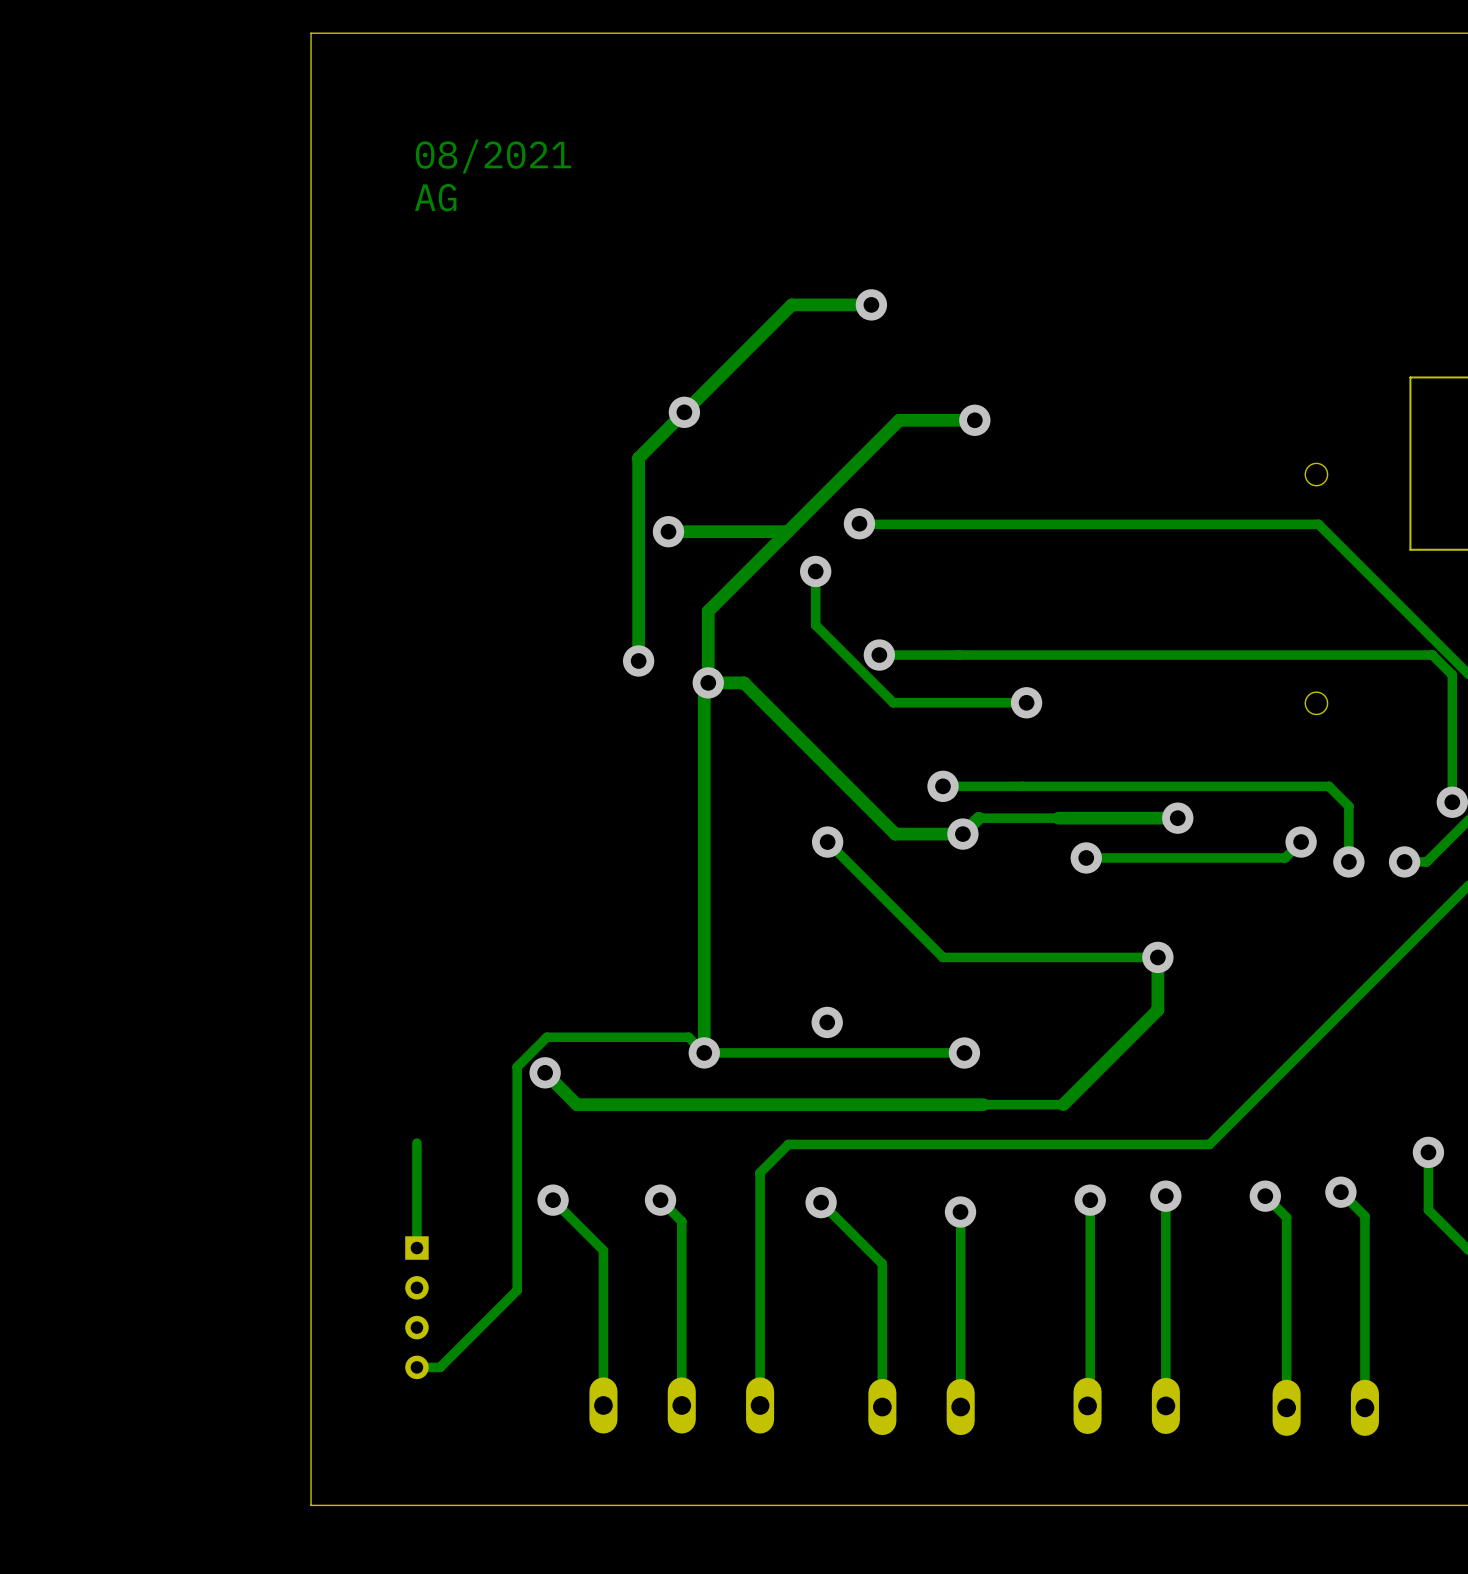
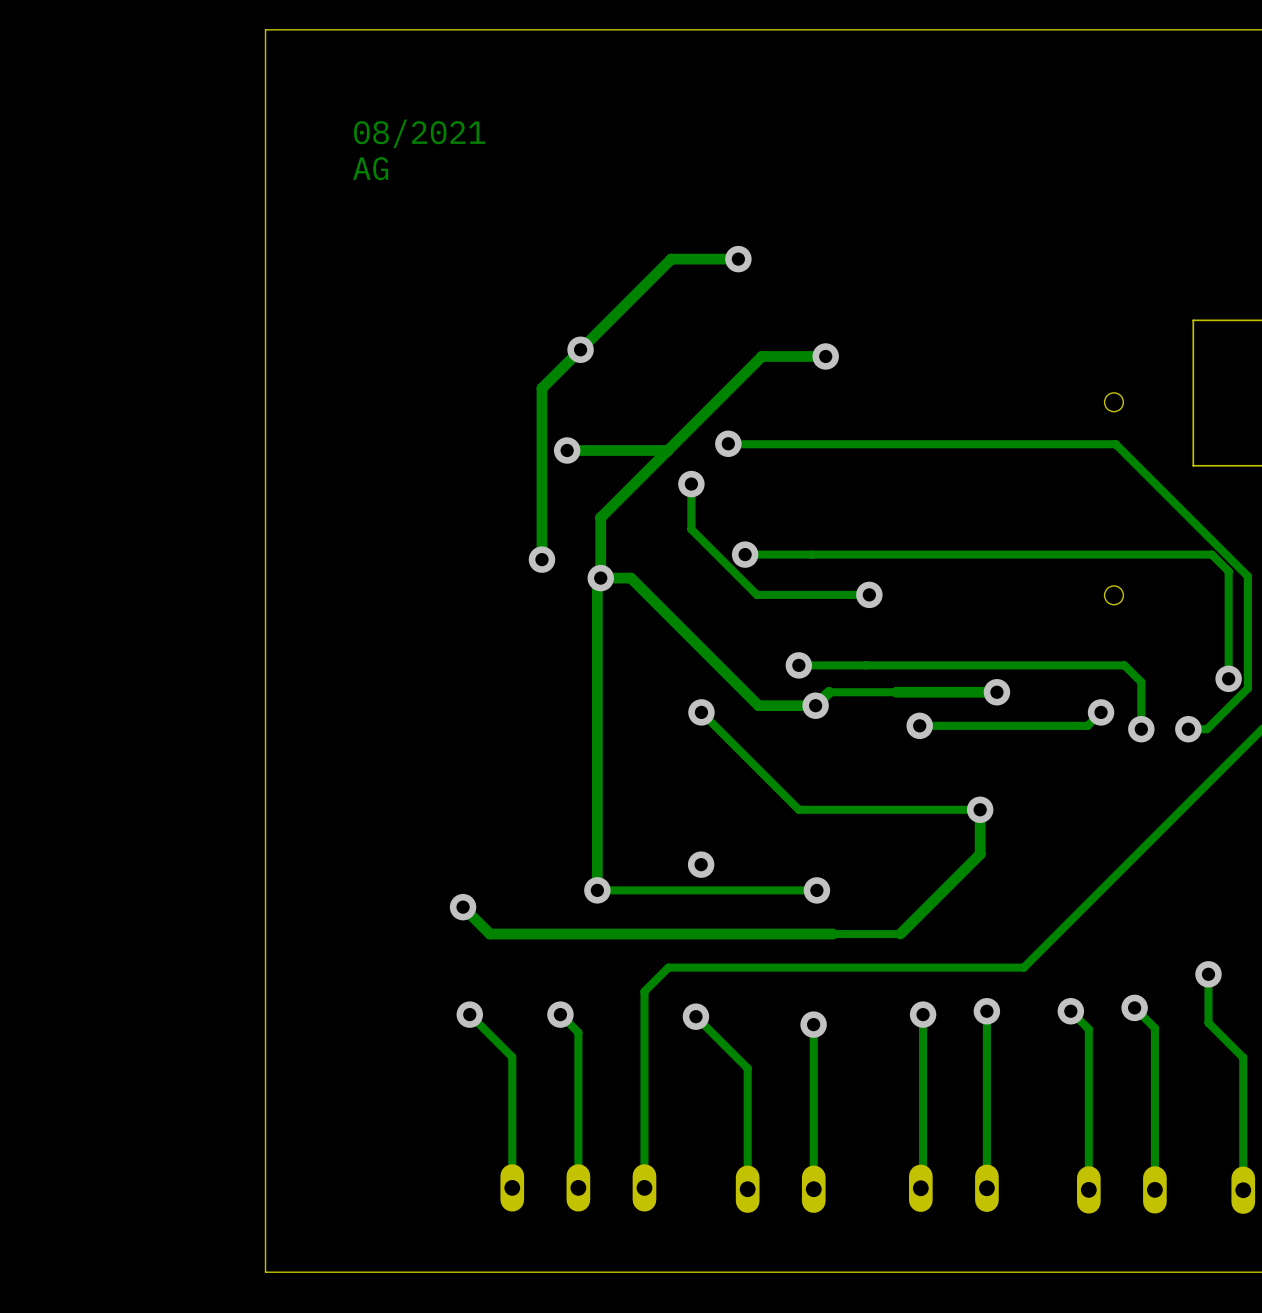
track: (704, 1052) (688, 1037) (546, 1037) (517, 1066) (517, 1290) (440, 1367) (416, 1367) -> none
track: (416, 1143) (416, 1248) -> none
part: (416, 1307) -> none

